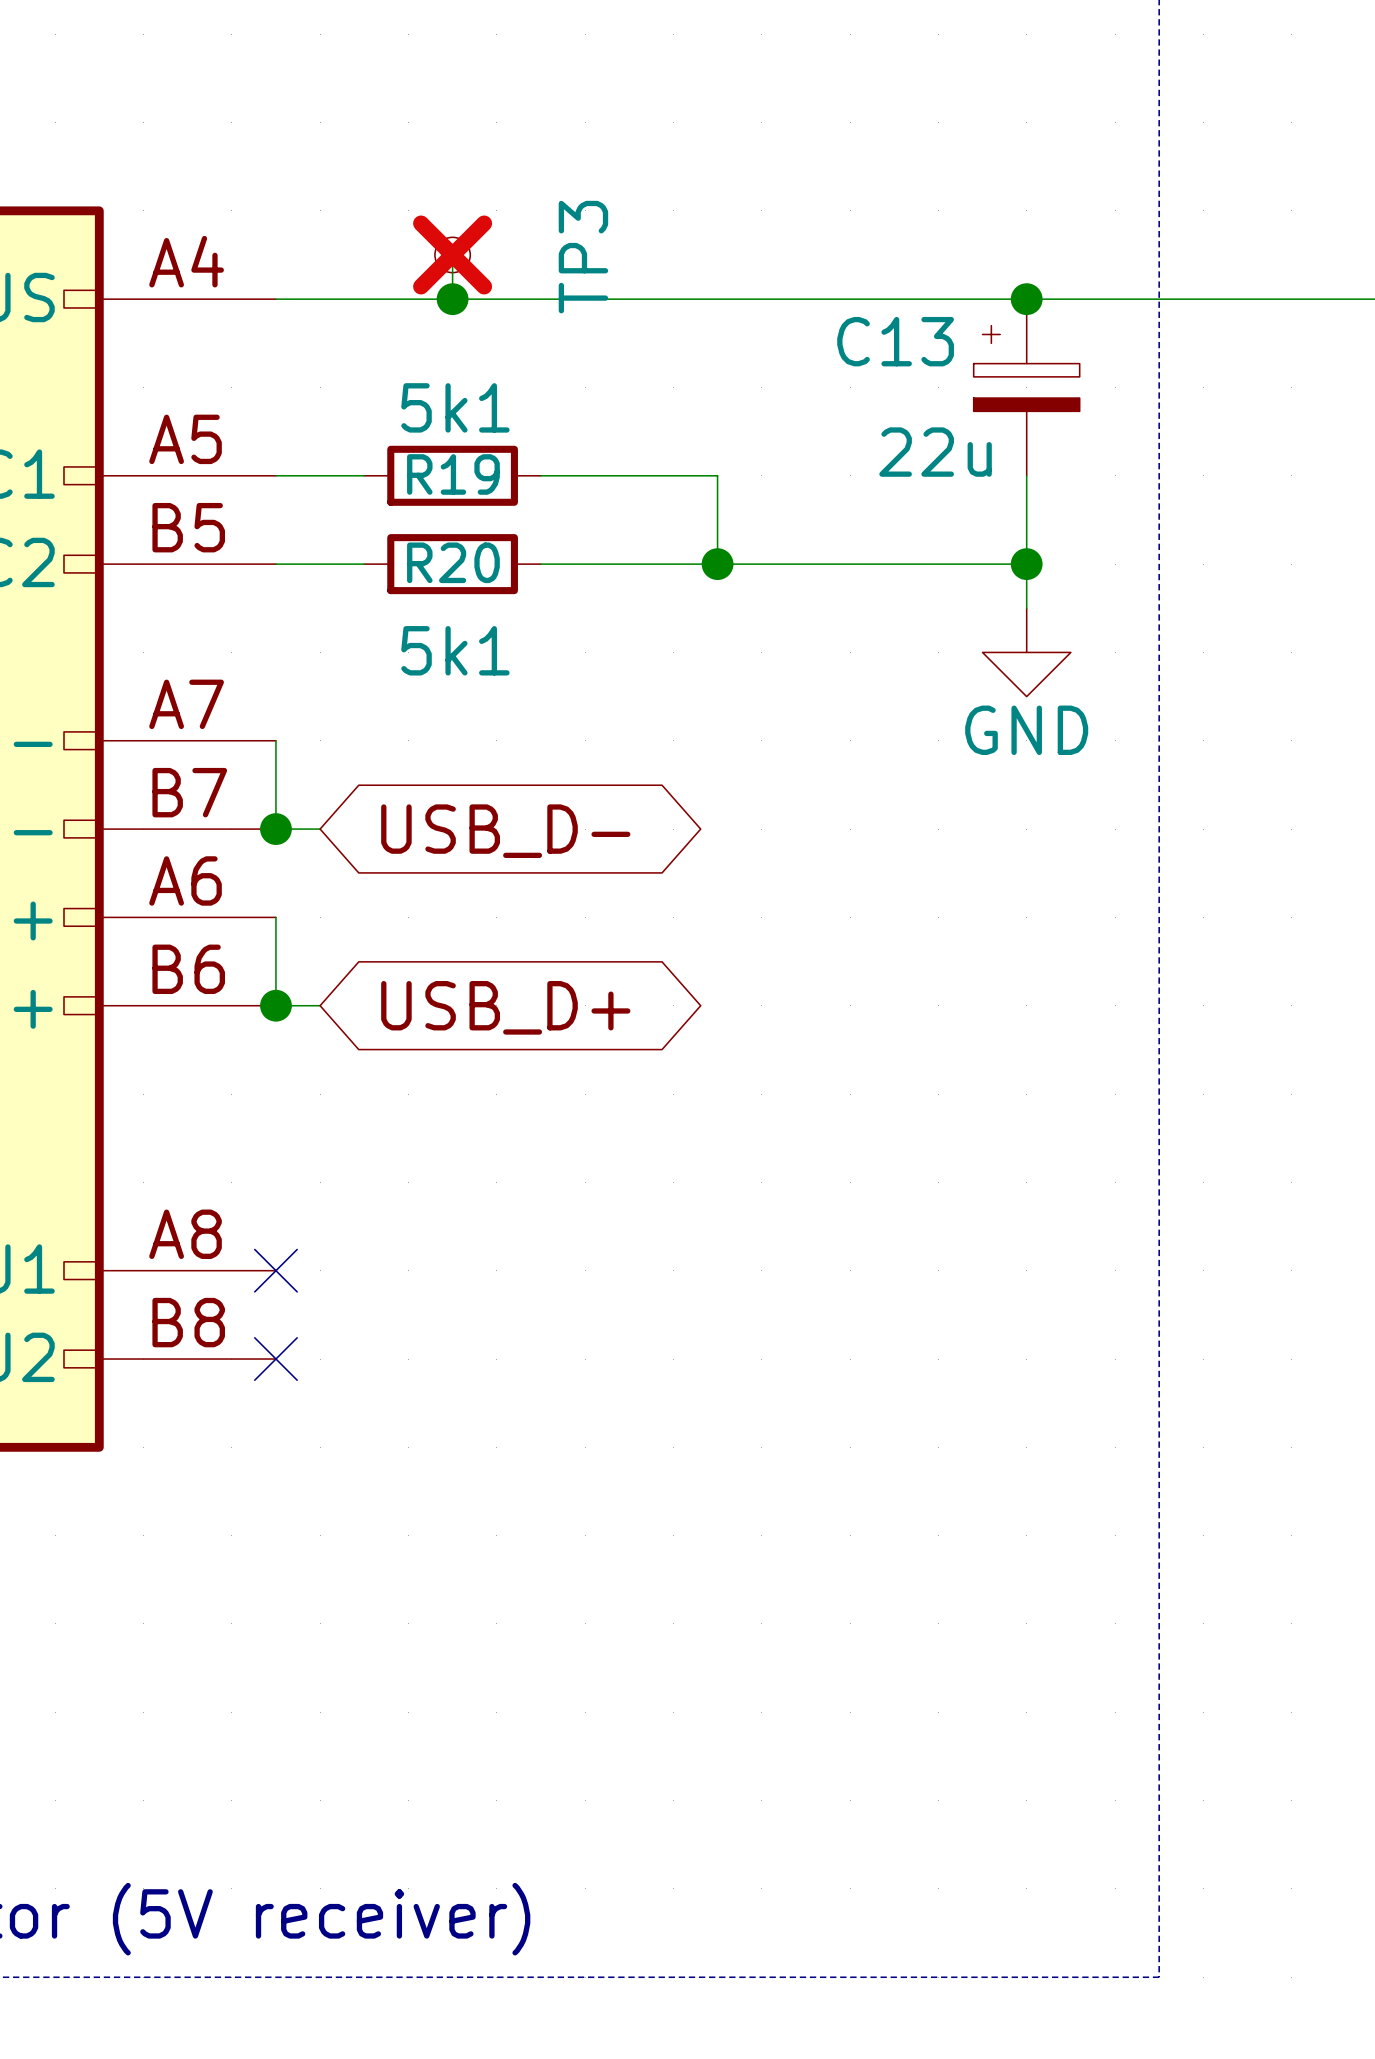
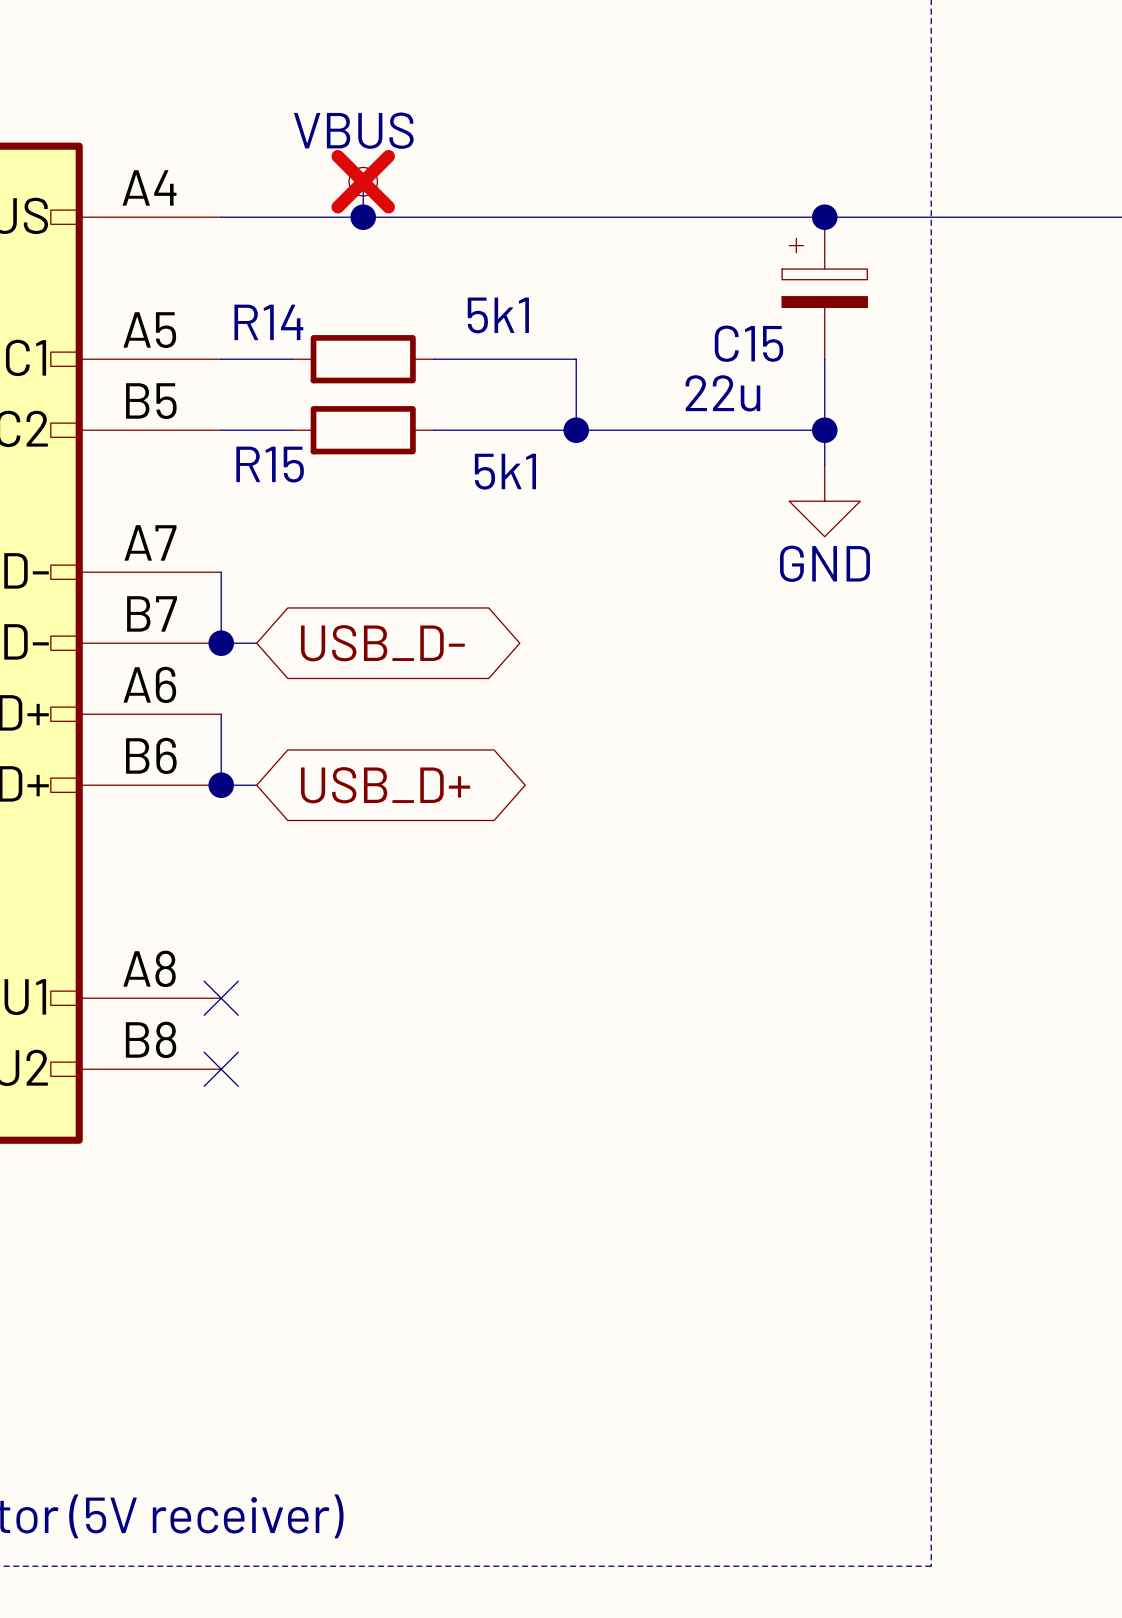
TP3 value: none -> VBUS (353, 130)
TP3 name: TP3 (583, 257) -> none
C13 name: C13 (895, 341) -> C15 (749, 343)
R19 value position: 5k1 (455, 407) -> 5k1 (498, 315)
C13 value position: 22u (935, 452) -> 22u (722, 393)
R19 name: R19 (453, 474) -> R14 (268, 322)
R20 name: R20 (453, 562) -> R15 (270, 464)
R20 value position: 5k1 (455, 650) -> 5k1 (505, 471)

